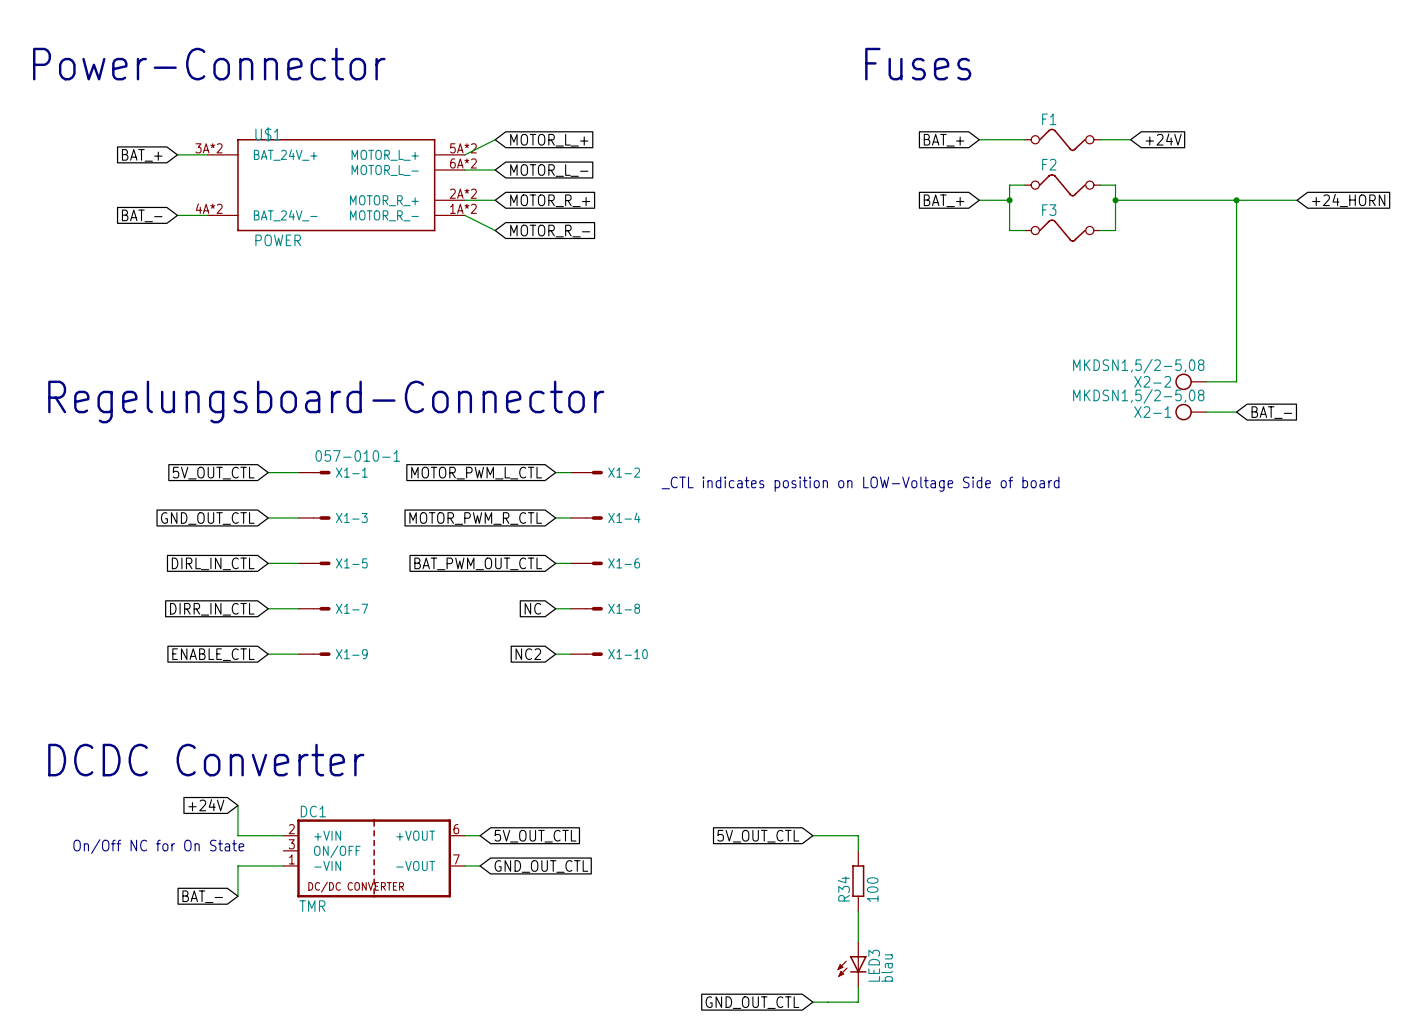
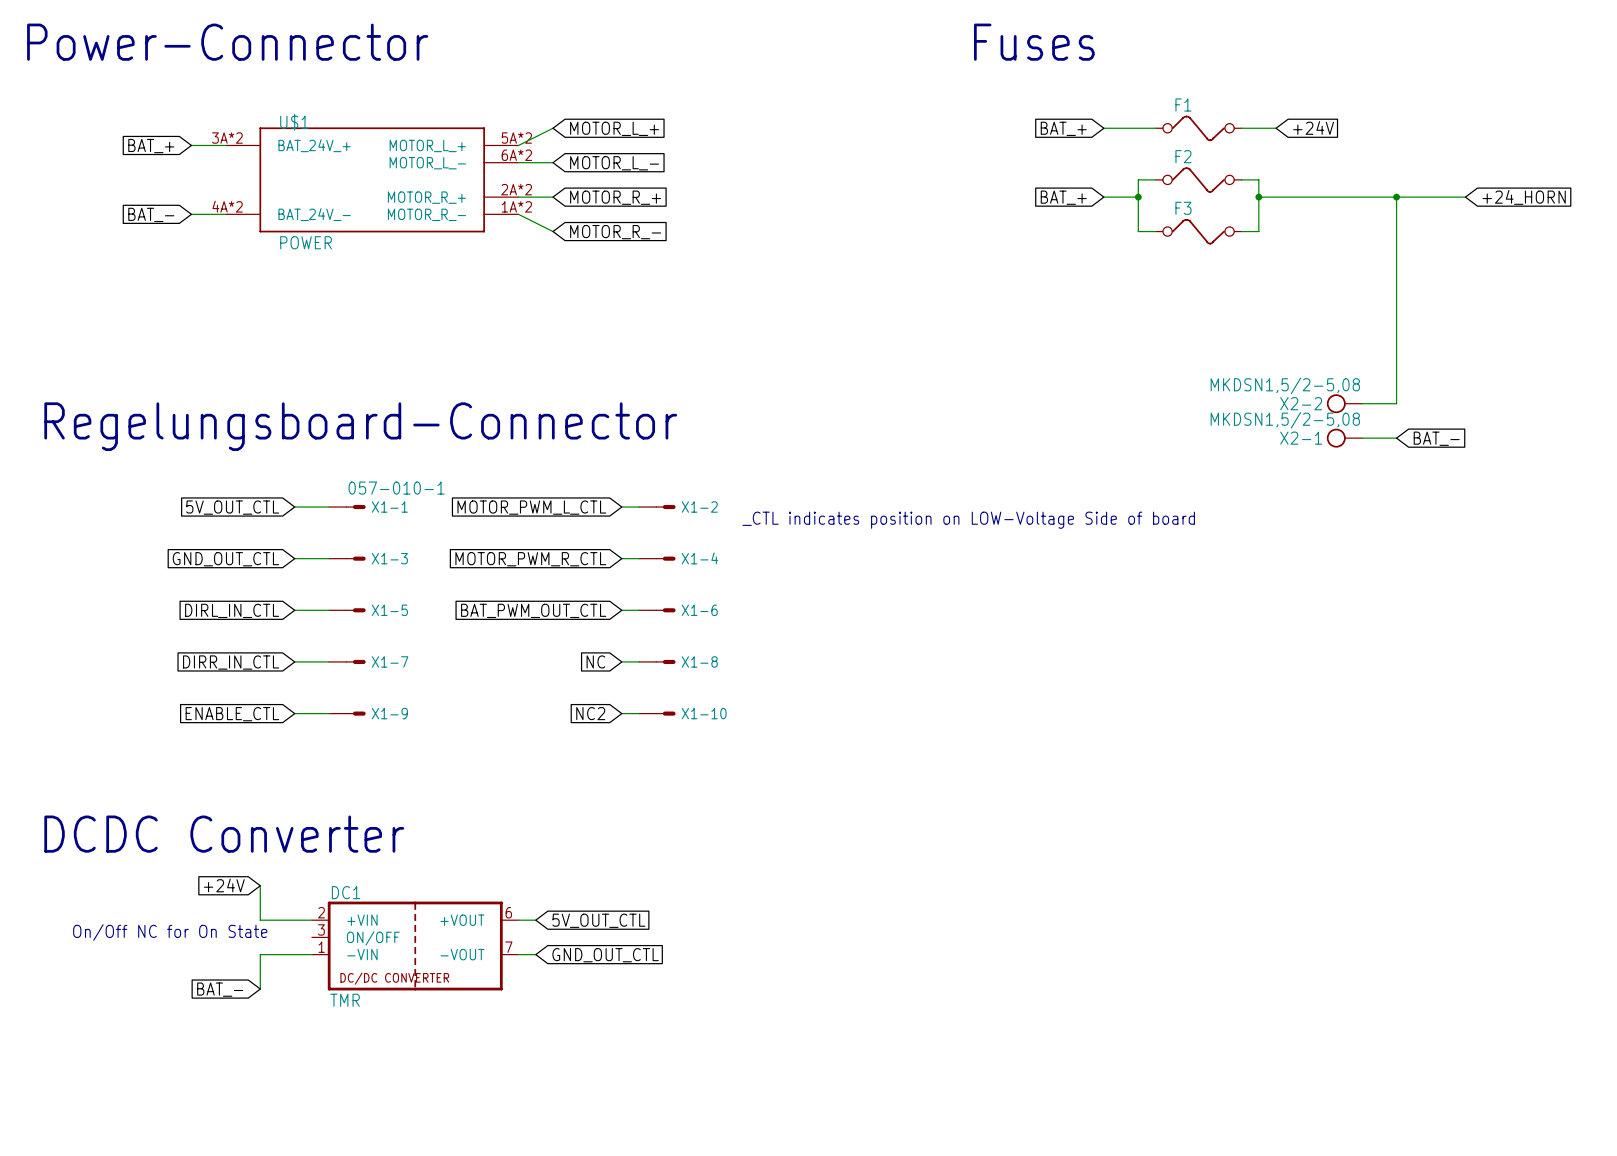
wire: (812, 835) (858, 835) (858, 850) -> none
global label: 5V_OUT_CTL (758, 836) -> none
R34: 100 (858, 881) -> none
wire: (858, 911) (858, 941) -> none
LED3: blau (852, 964) -> none
wire: (858, 987) (858, 1002) (812, 1002) -> none
global label: GND_OUT_CTL (752, 1002) -> none

